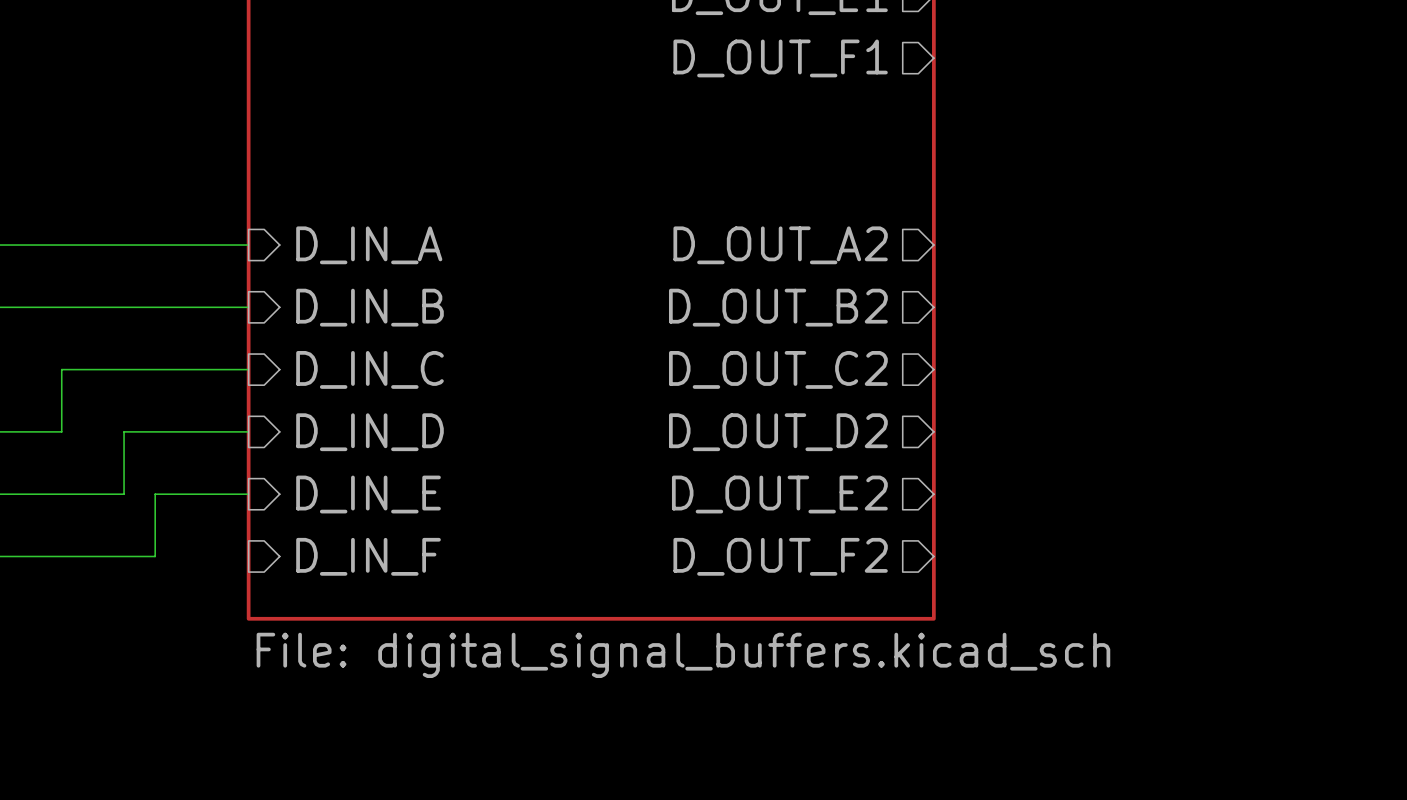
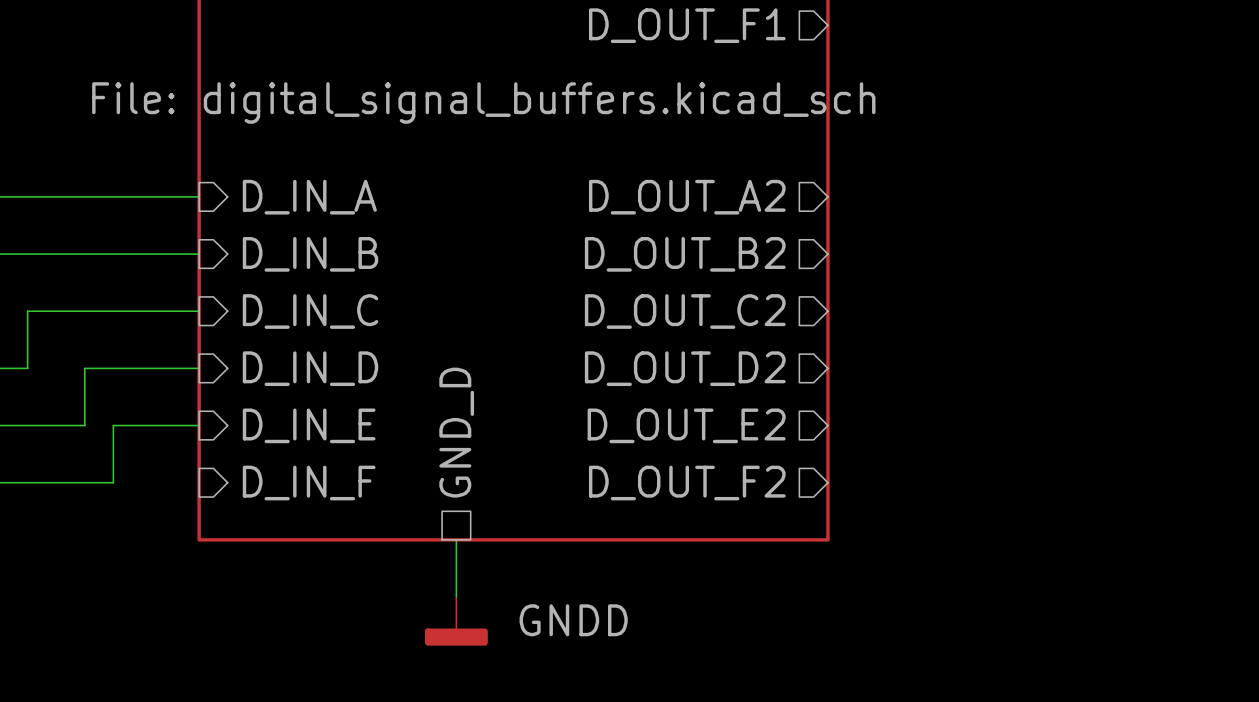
sheet pin: none -> GND_D (456, 432)
wire: none -> (456, 539) (456, 597)
sheet value position: File: digital_signal_buffers.kicad_sch (683, 655) -> File: digital_signal_buffers.kicad_sch (483, 102)
power symbol: none -> GNDD (456, 621)

